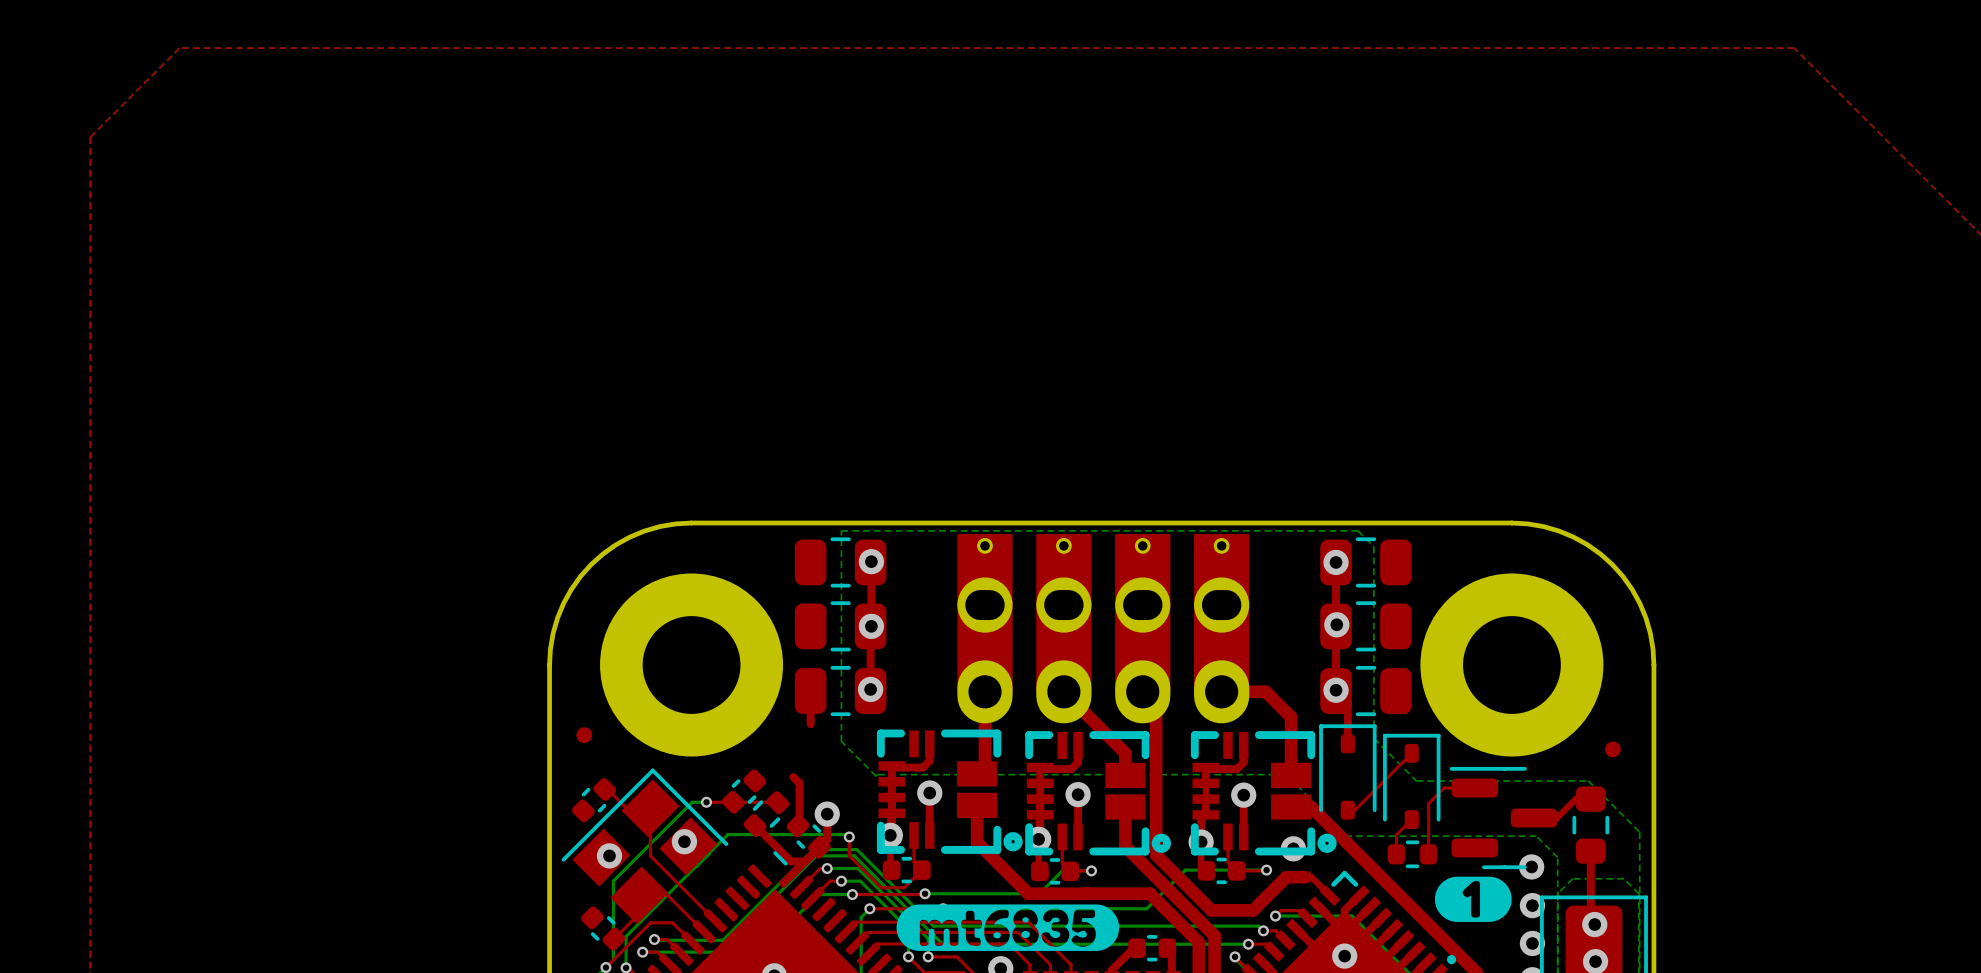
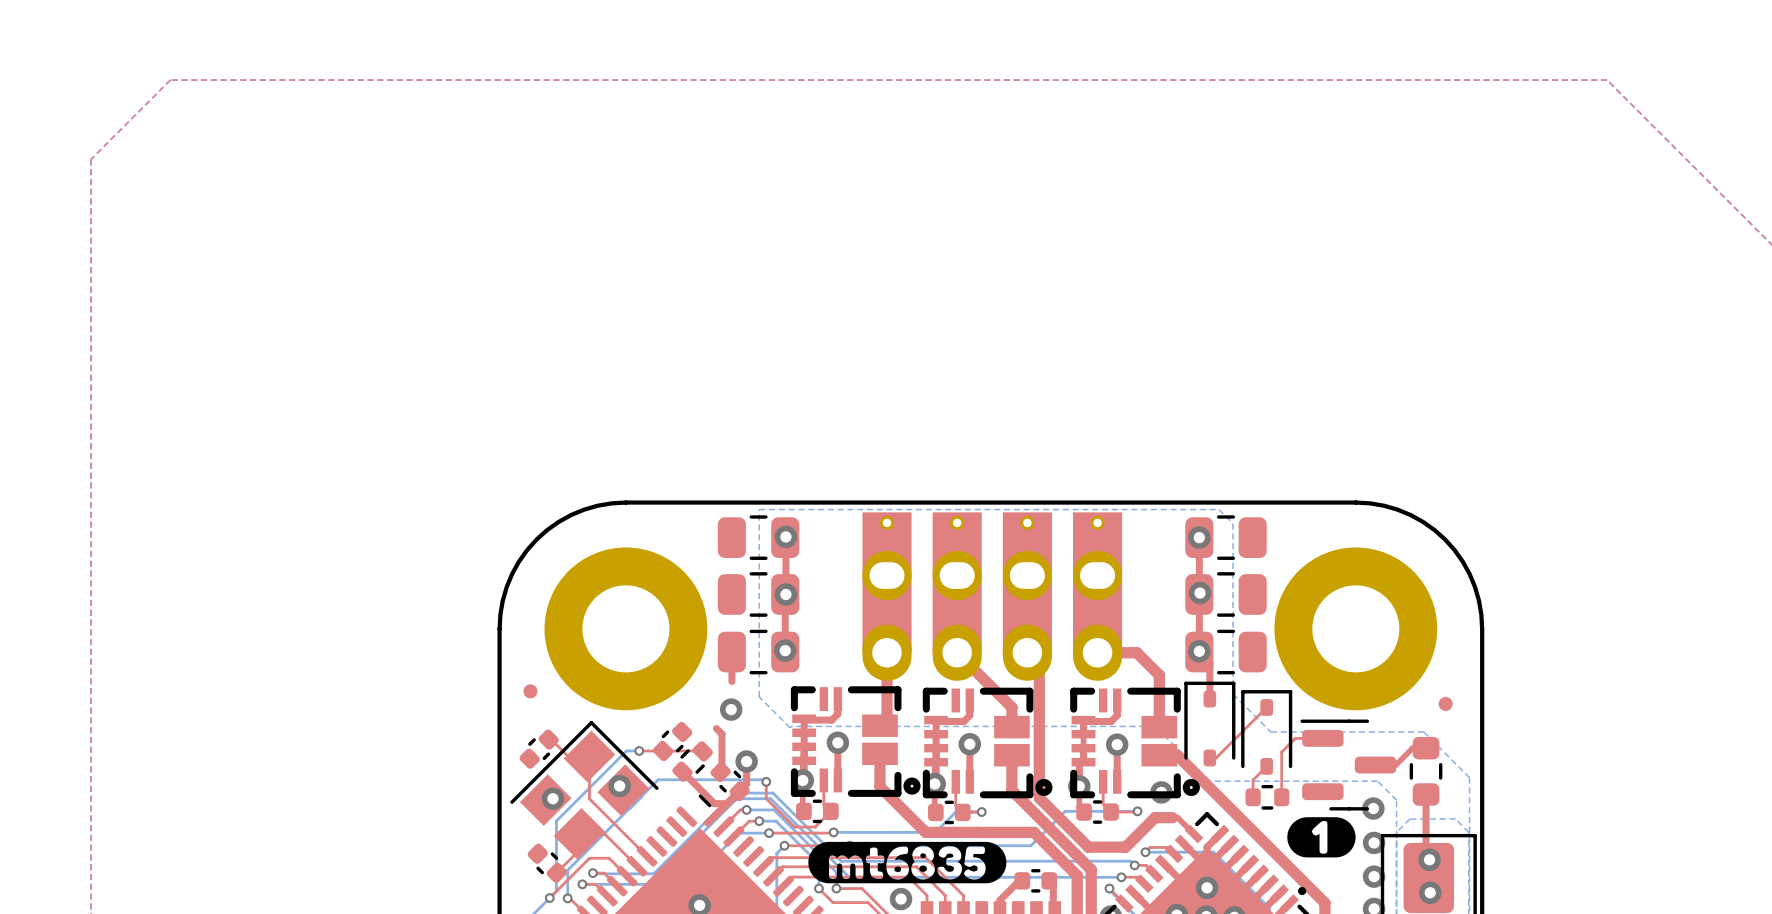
via: none -> (731, 709)

